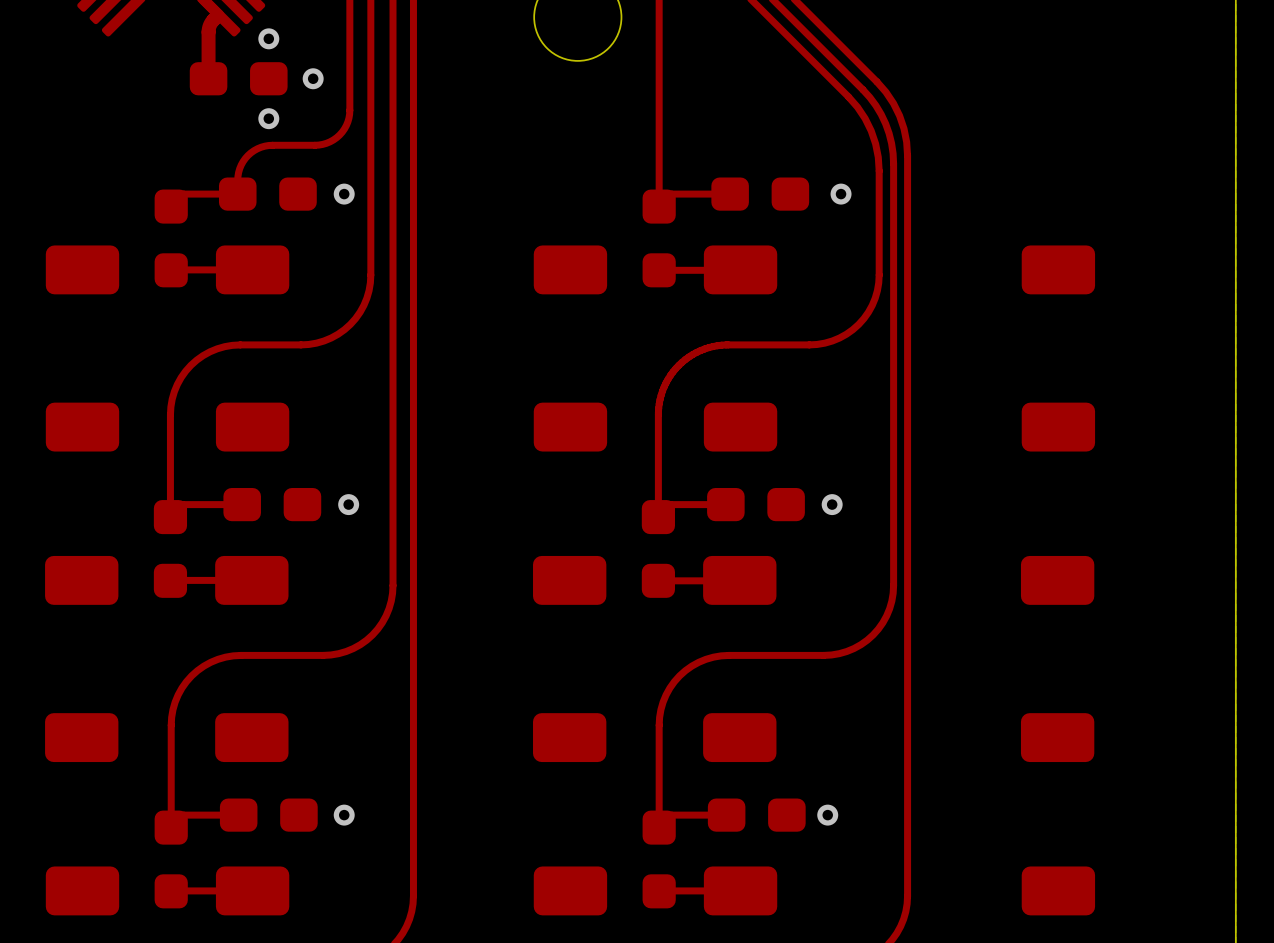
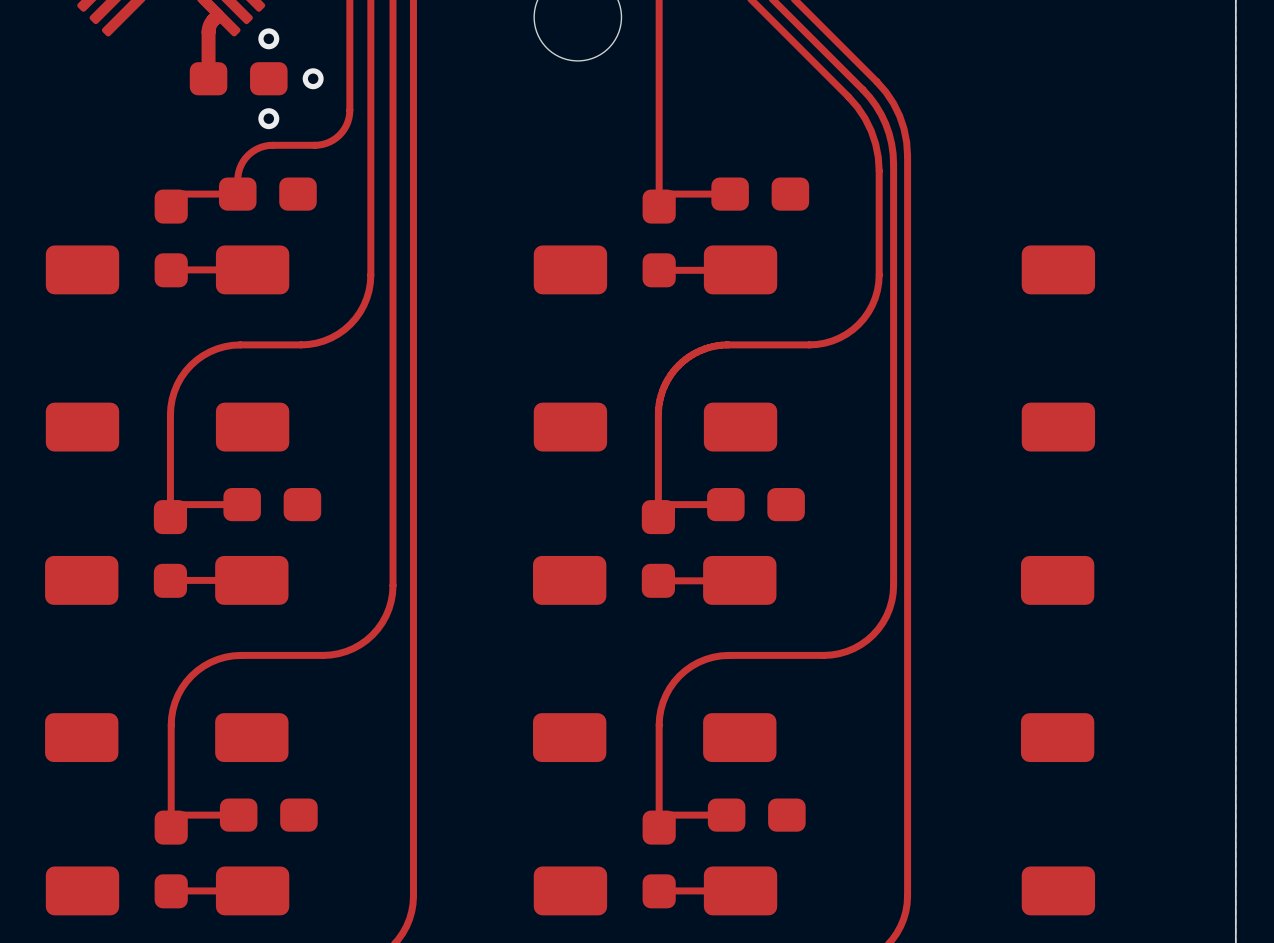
via: (344, 194) -> none
via: (841, 194) -> none
via: (348, 504) -> none
via: (832, 504) -> none
via: (344, 815) -> none
via: (827, 815) -> none

